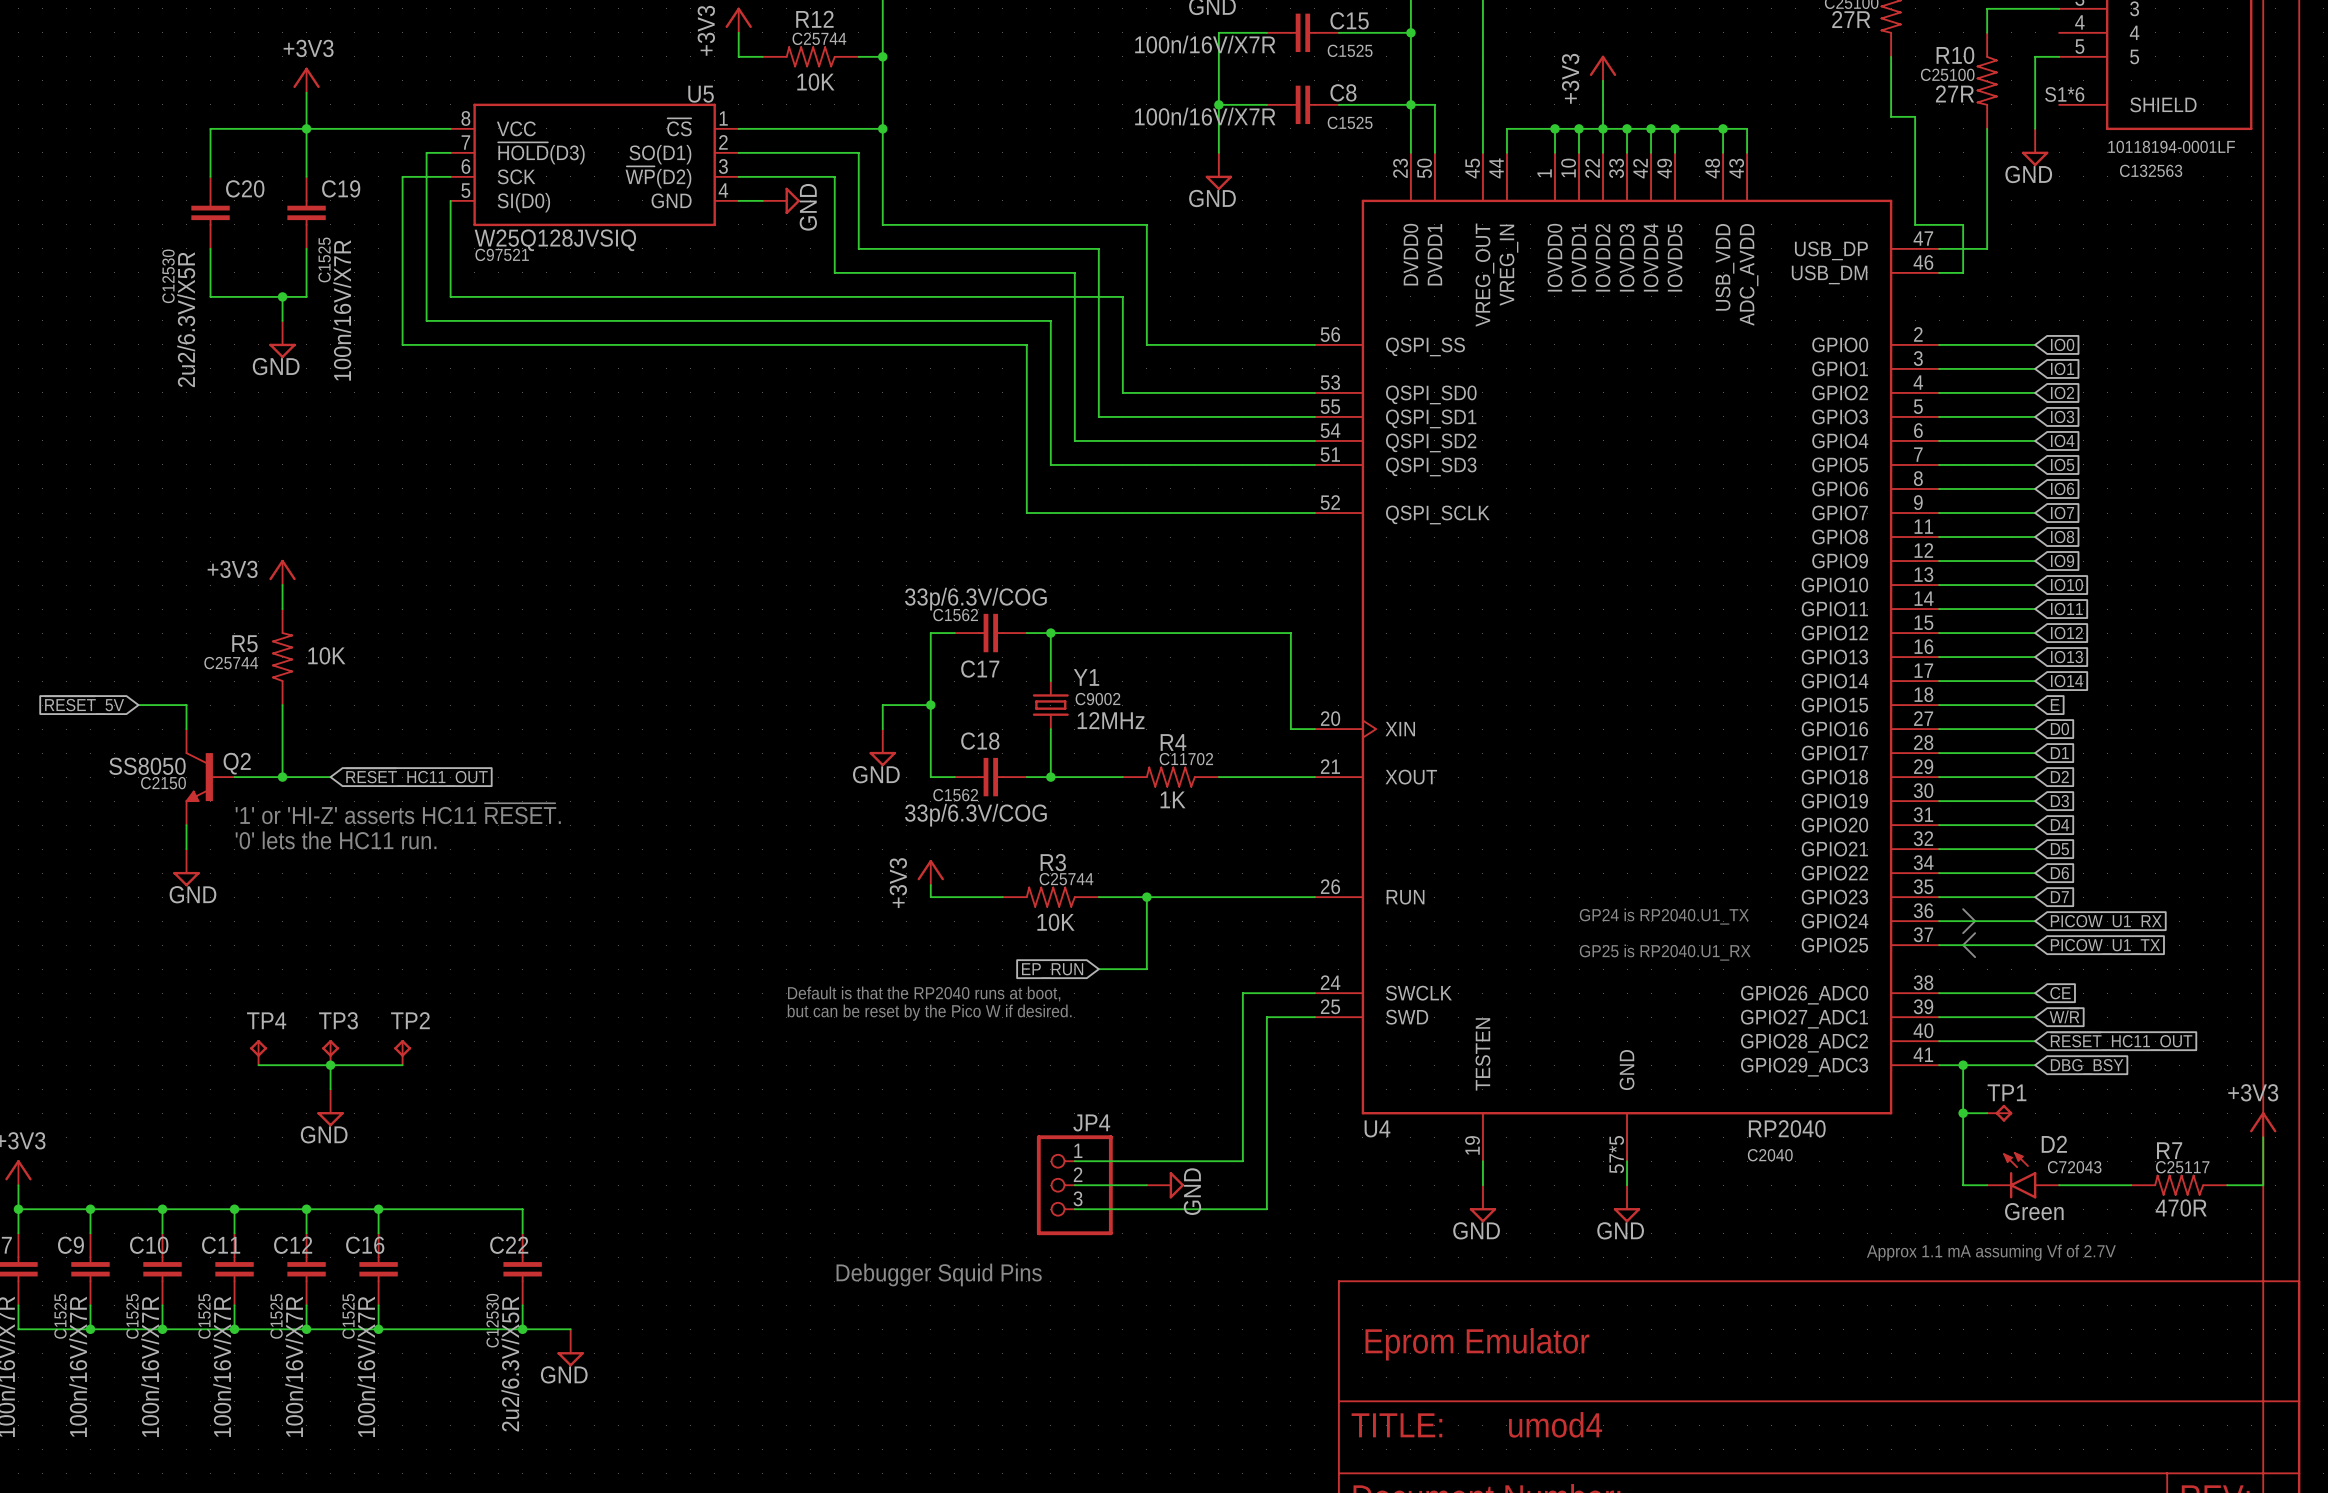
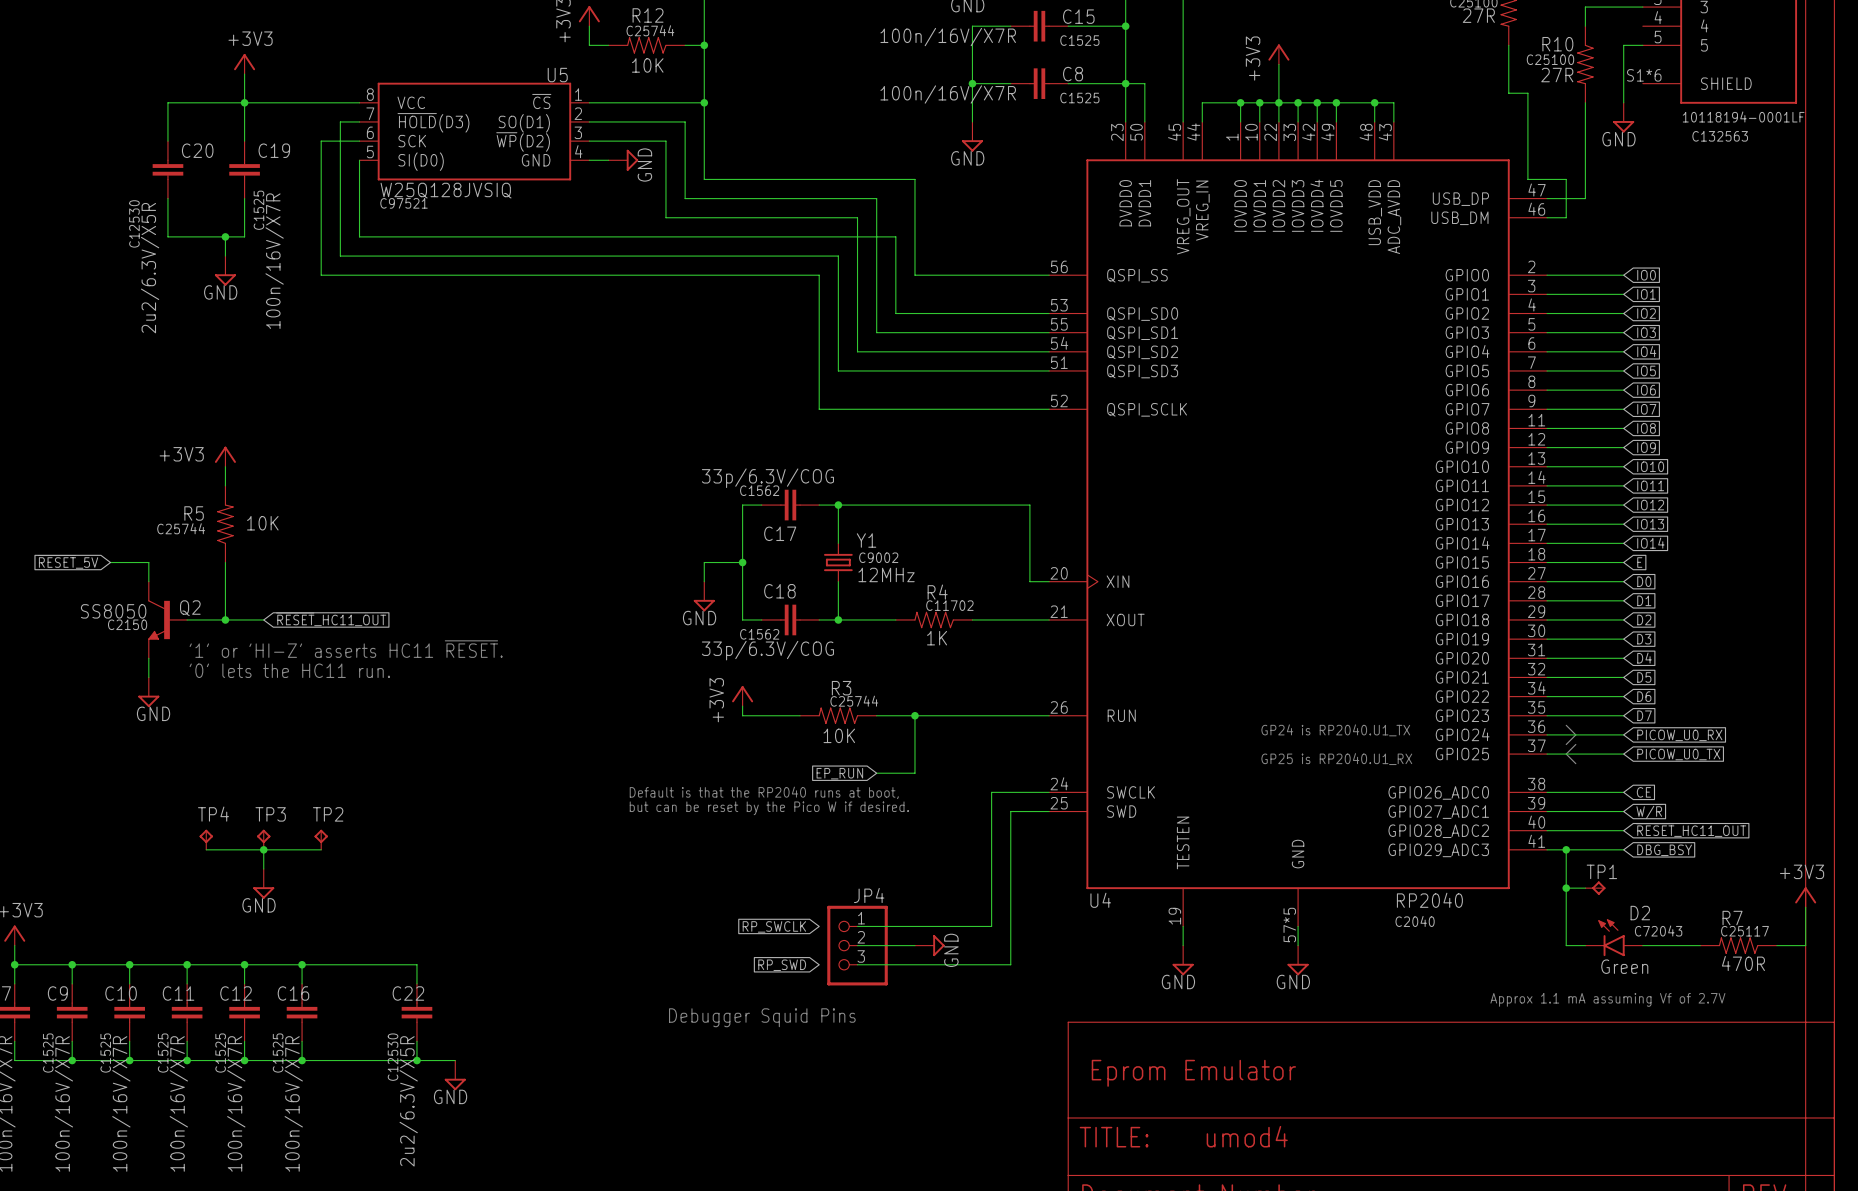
global label: PICOW_U1_RX (2106, 922) -> PICOW_U0_RX (1679, 735)
global label: PICOW_U1_TX (2105, 946) -> PICOW_U0_TX (1678, 754)
global label: none -> RP_SWCLK (774, 926)
global label: none -> RP_SWD (782, 965)

